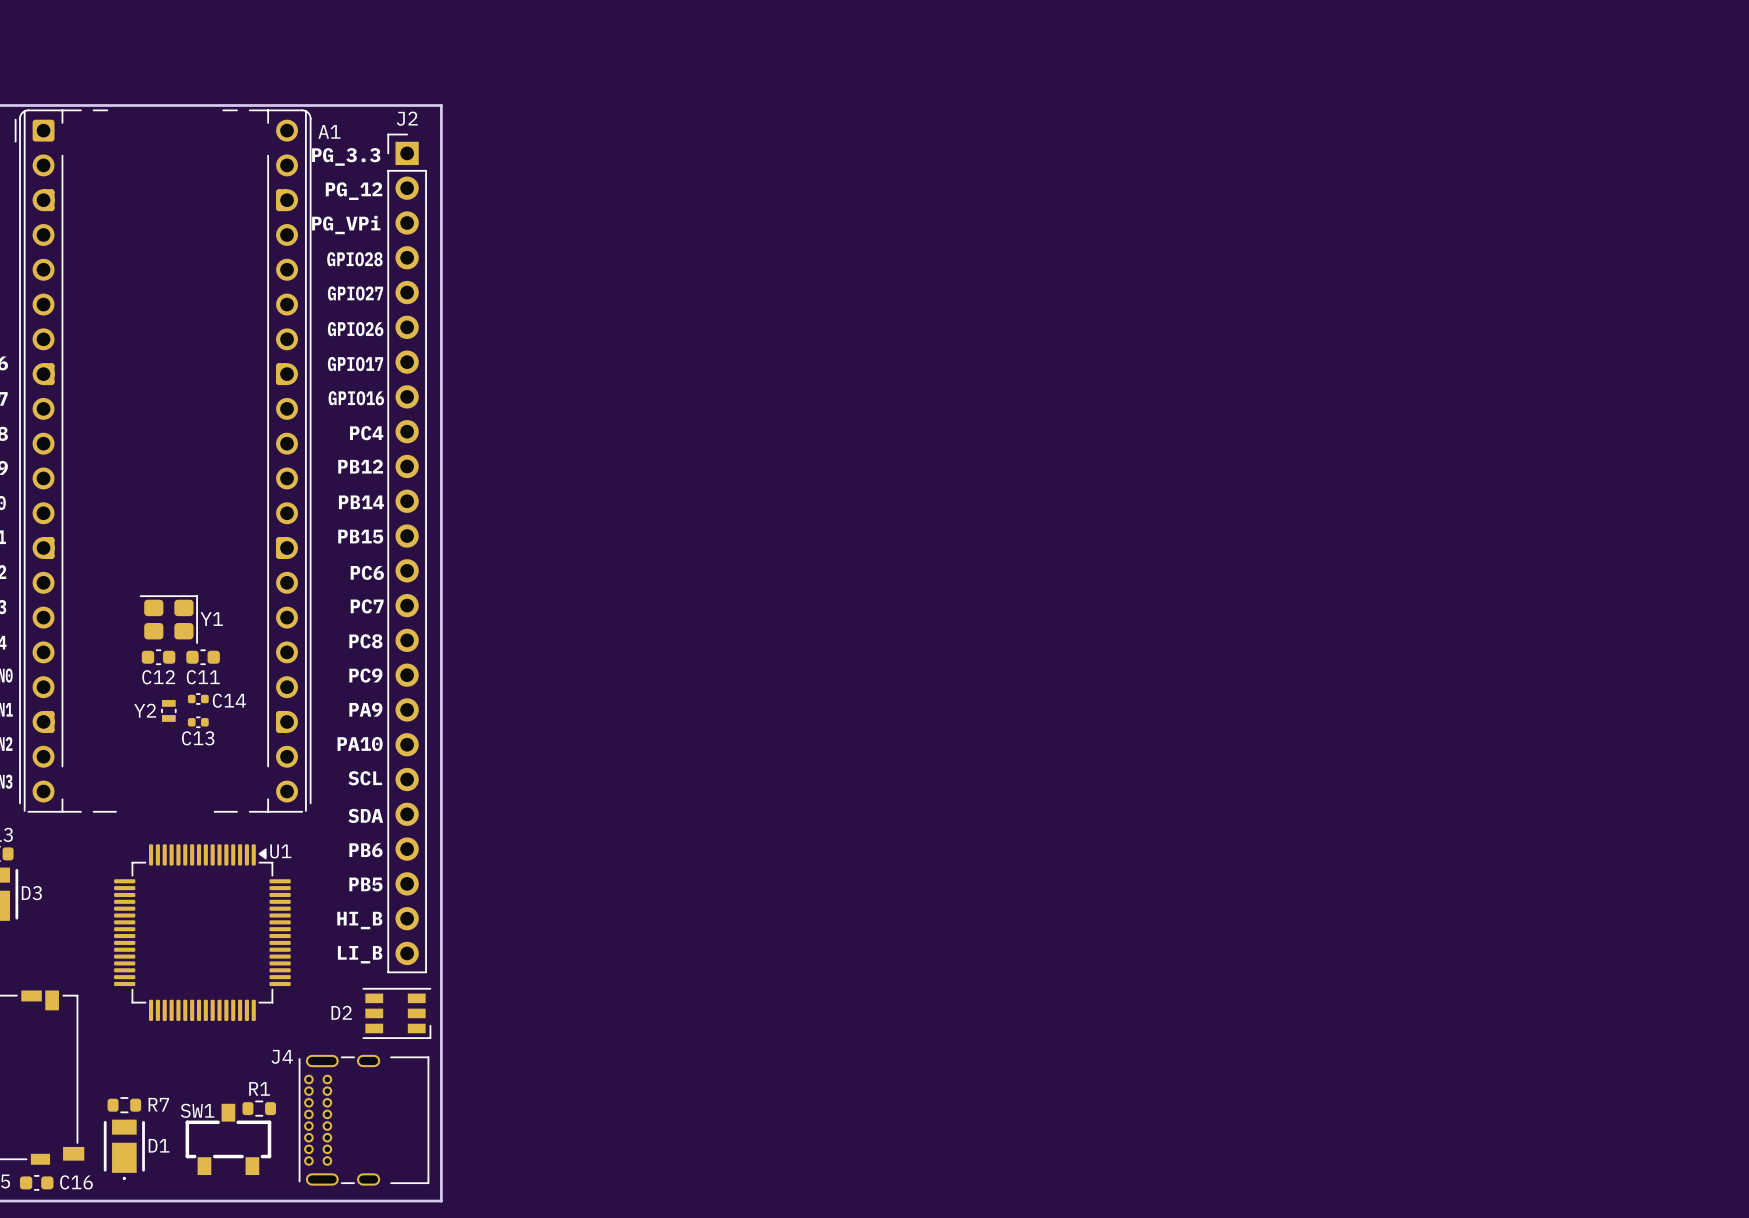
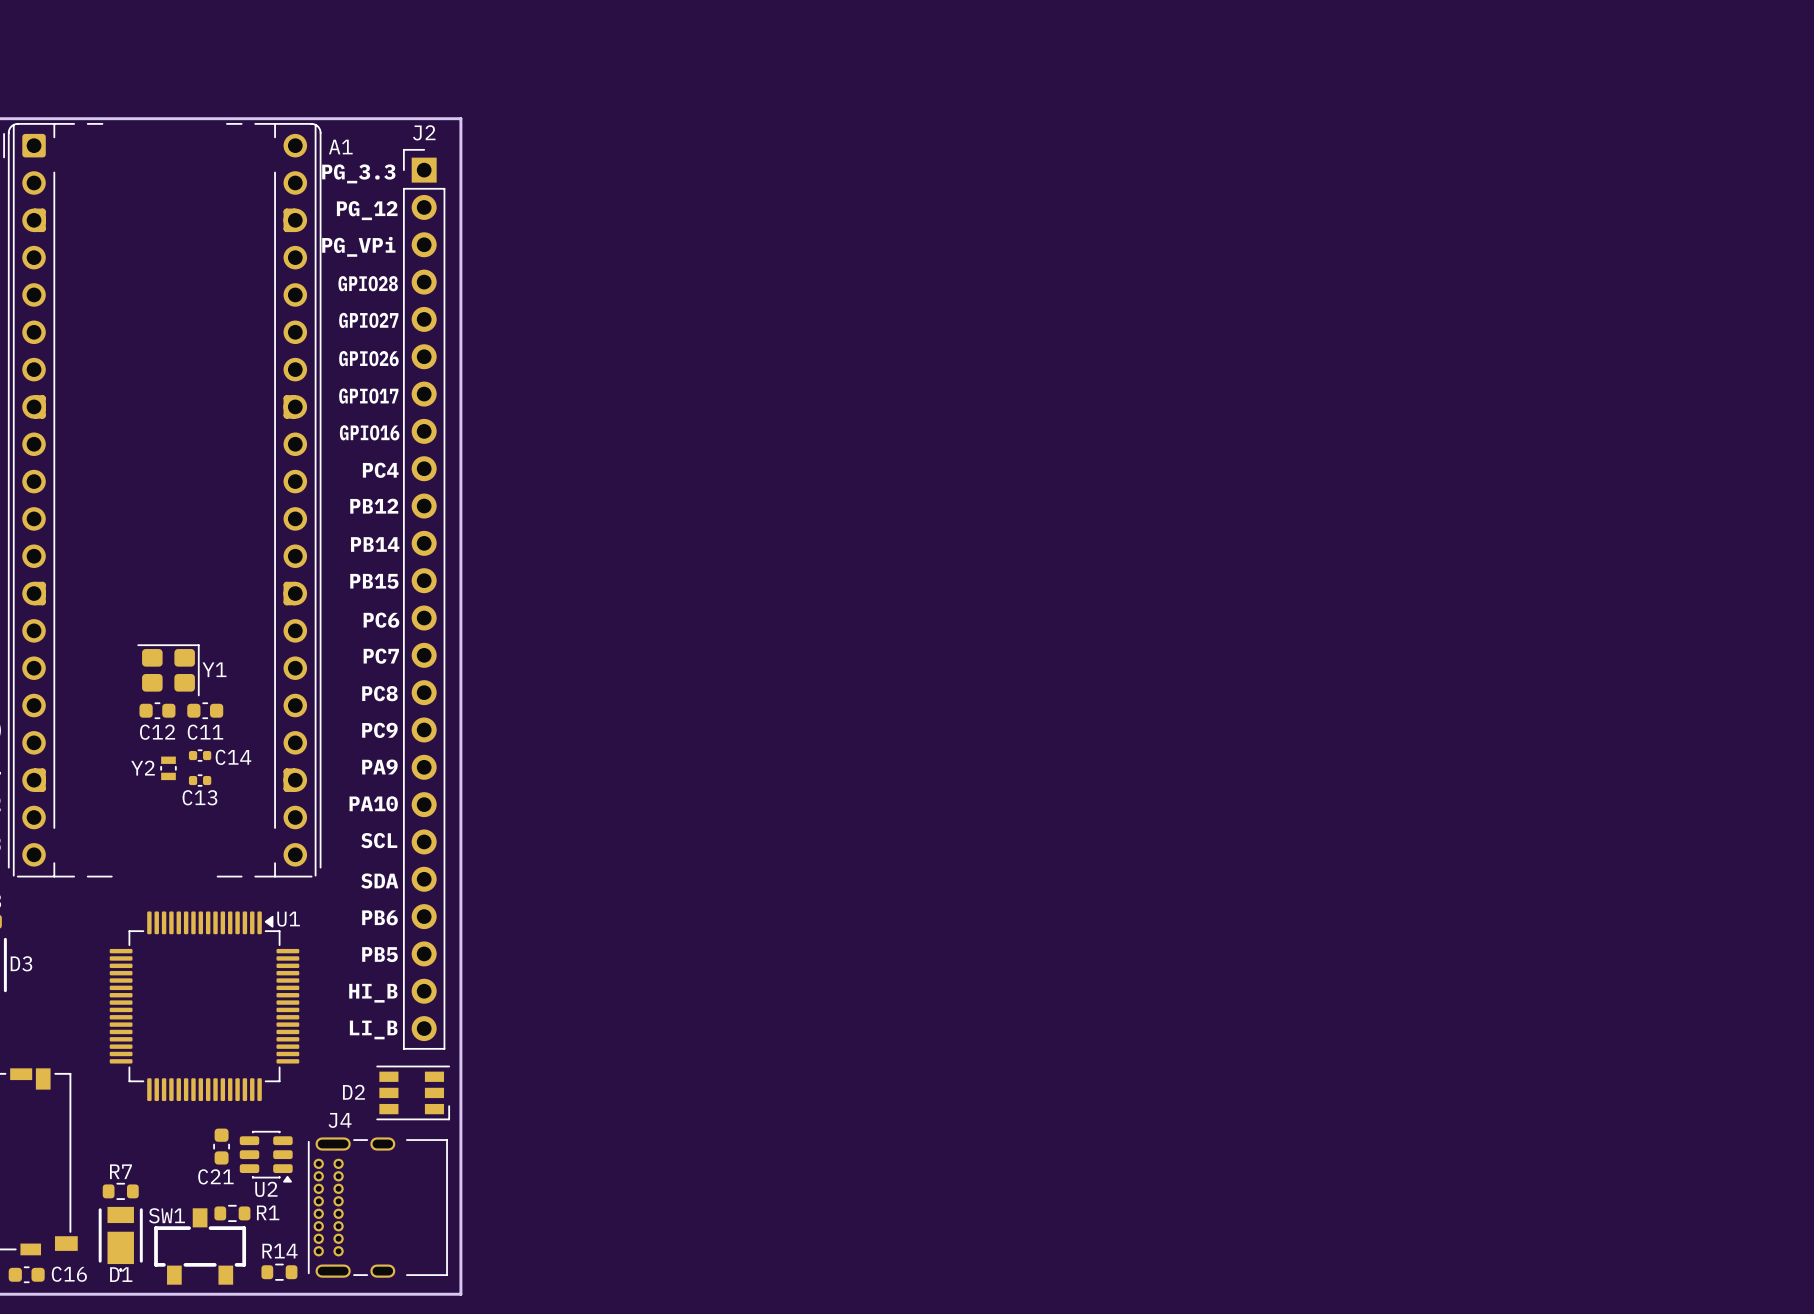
J4 name position: J4 (282, 1056) -> J4 (340, 1120)
C21: none -> (221, 1146)
U2: none -> (266, 1156)
R1 name position: R1 (259, 1088) -> R1 (268, 1212)
R7 name position: R7 (158, 1104) -> R7 (120, 1171)
R1 position: (259, 1108) -> (232, 1213)
SW1 position: (228, 1139) -> (200, 1246)
D1 name position: D1 (159, 1145) -> D1 (121, 1274)
R14: none -> (279, 1272)

